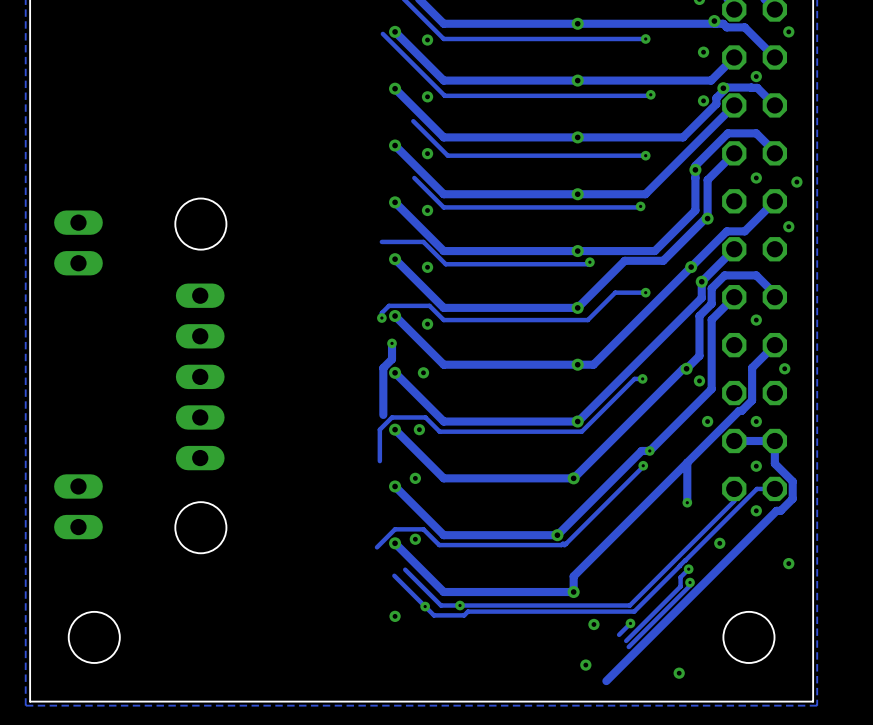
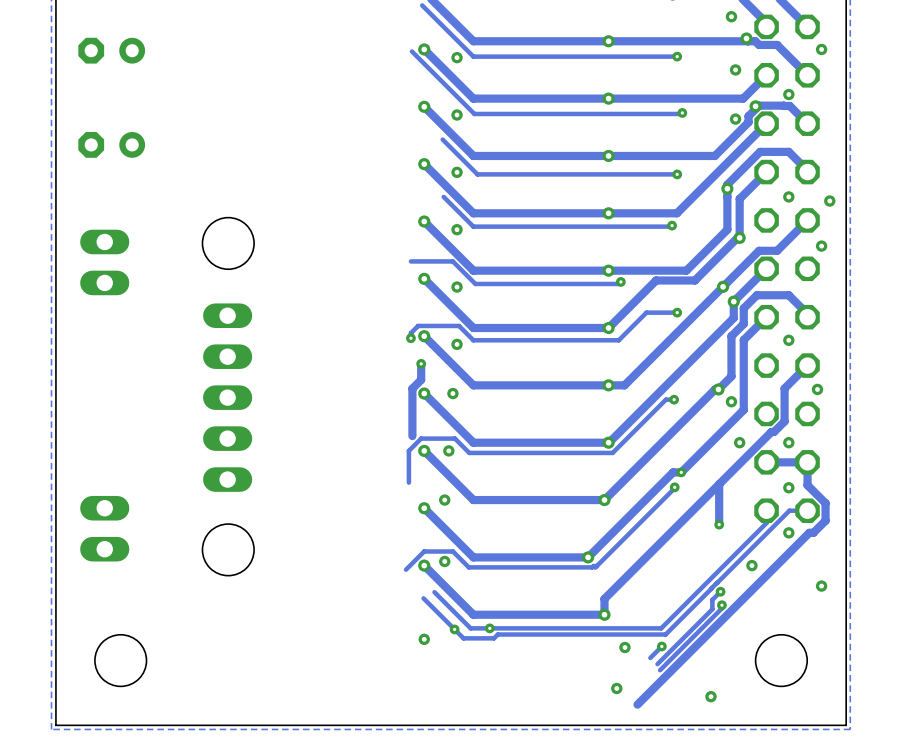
part: none -> (111, 50)
part: none -> (111, 144)

